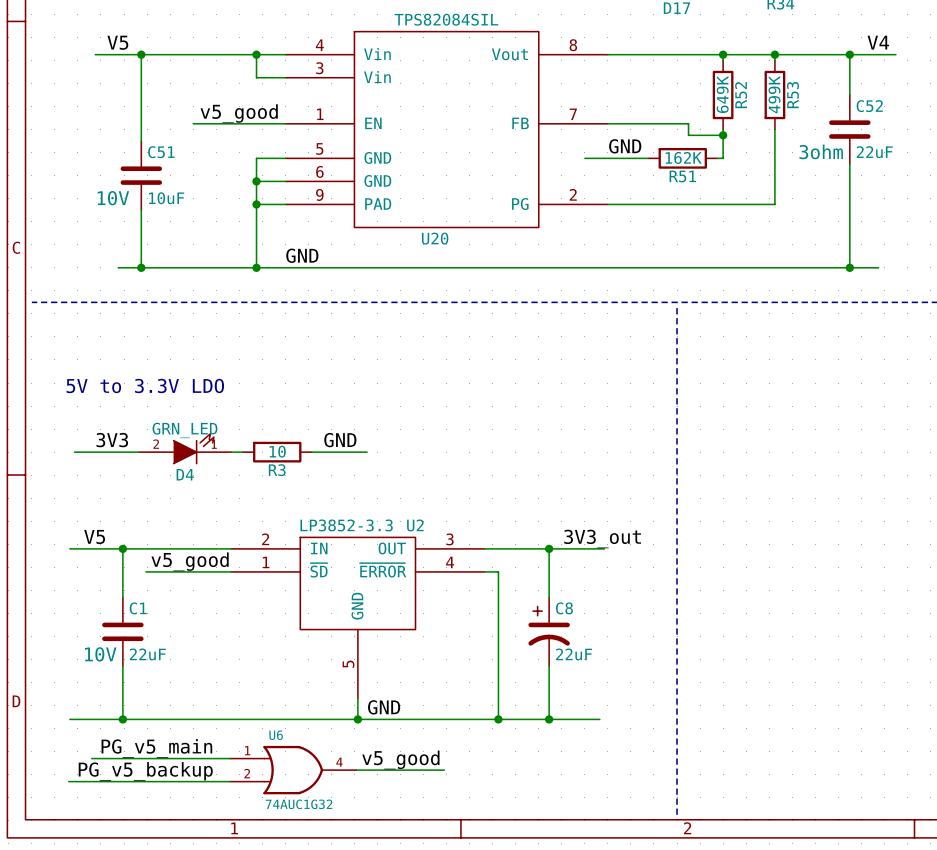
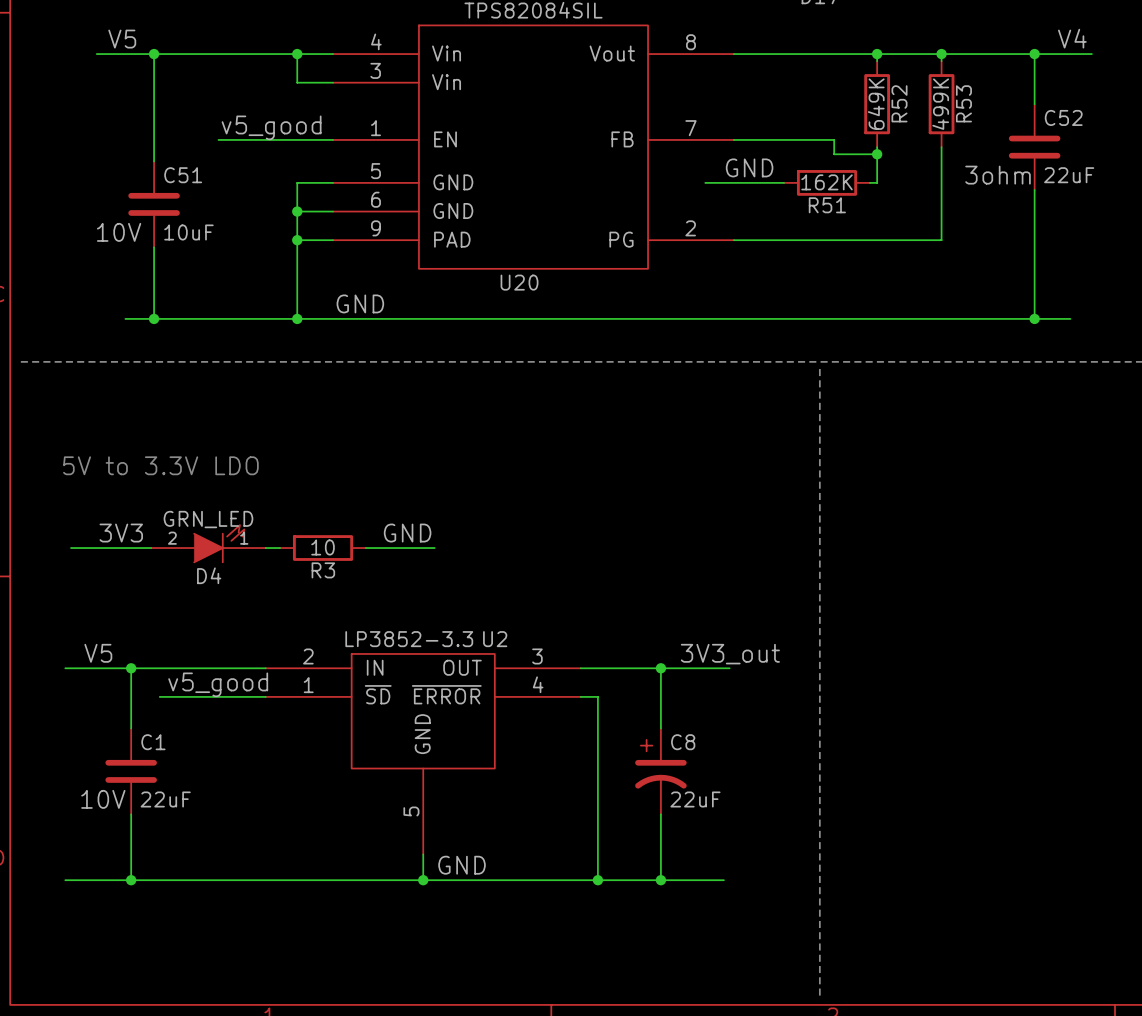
label: PG_v5_main (156, 748) -> none
wire: (91, 758) (230, 758) -> none
label: v5_good (400, 759) -> none
U6: 74AUC1G32 (293, 770) -> none
wire: (356, 770) (444, 770) -> none
label: PG_v5_backup (145, 771) -> none
wire: (68, 781) (230, 781) -> none

